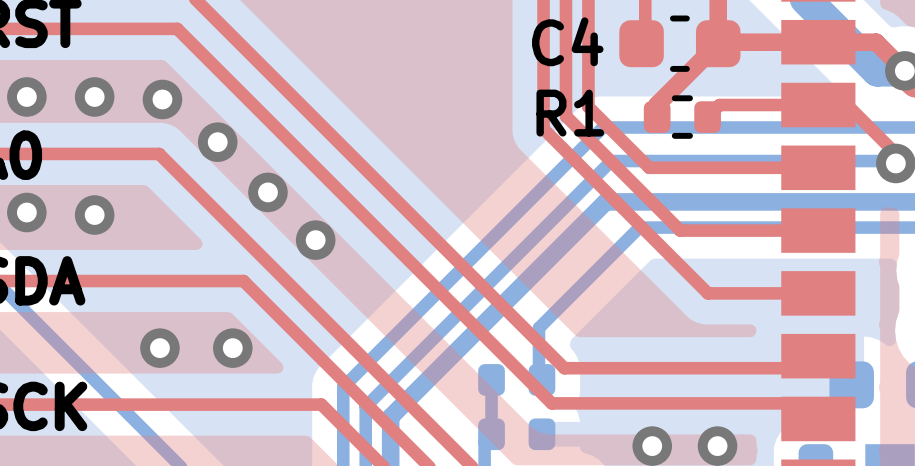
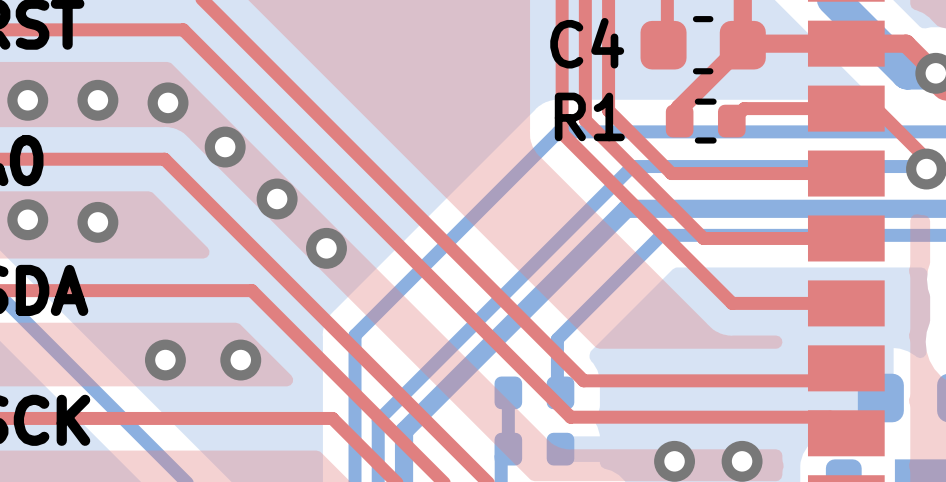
bottom track: (602, 127) (343, 387) -> (623, 131) (558, 131) (355, 335) (355, 400)

